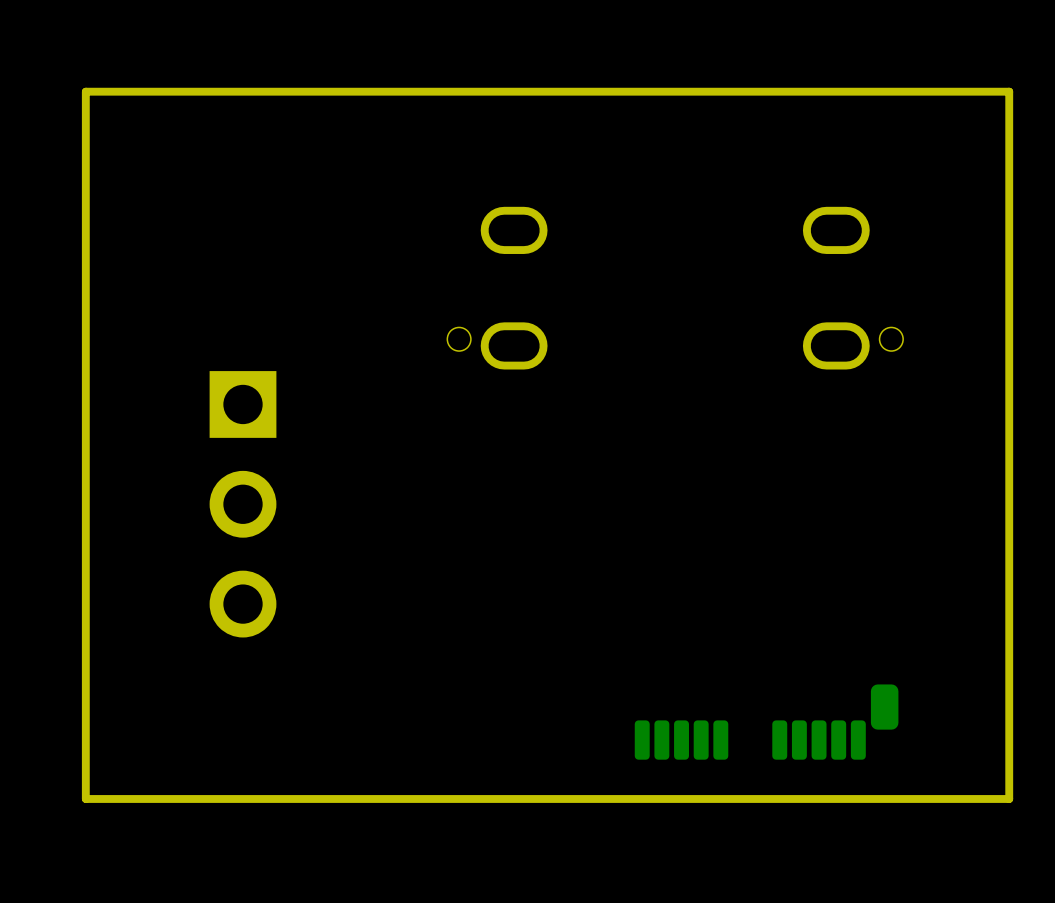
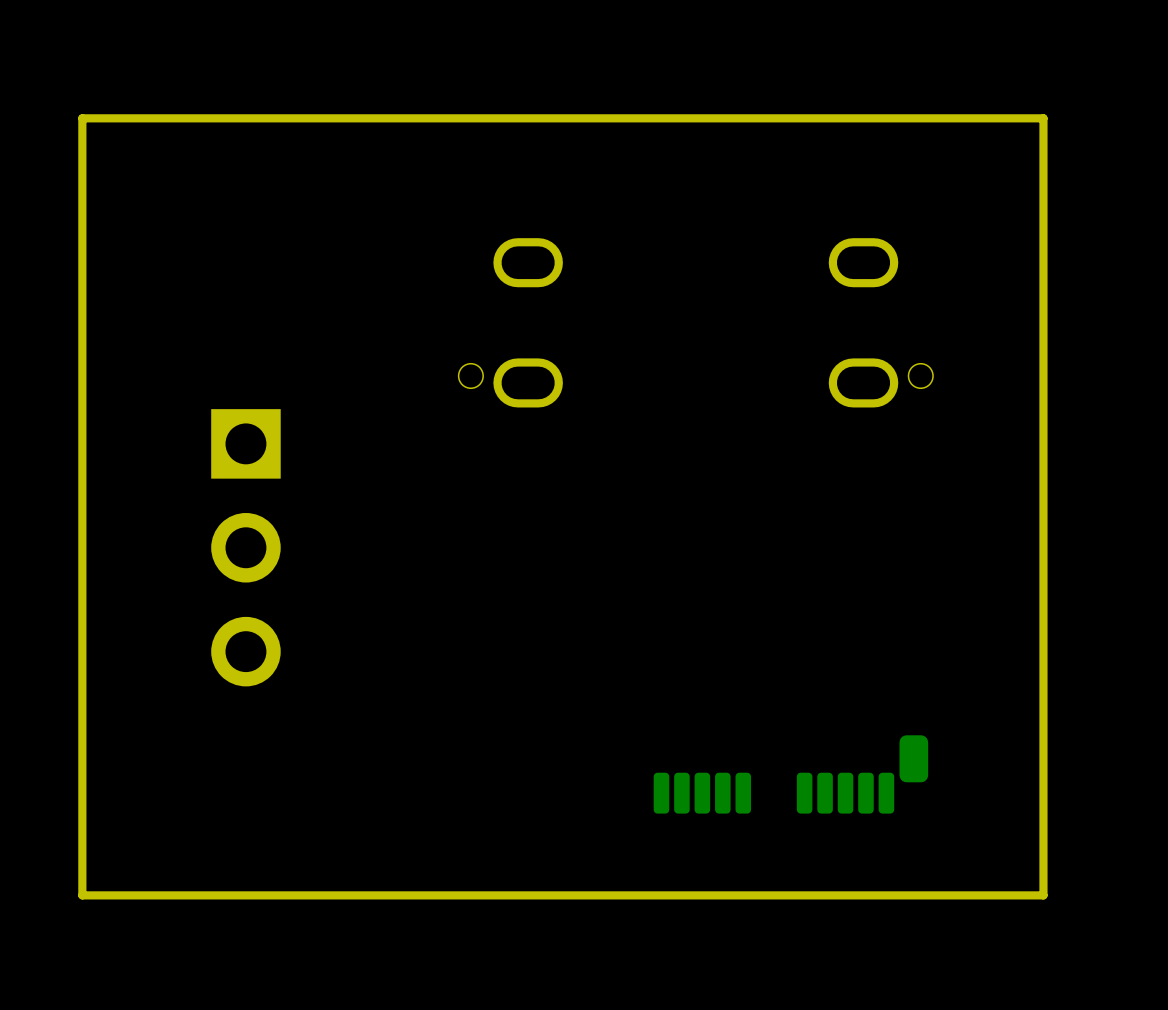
board edge: (1009, 798) (85, 798) -> (1043, 854) (1043, 895) (82, 895) (82, 854)

